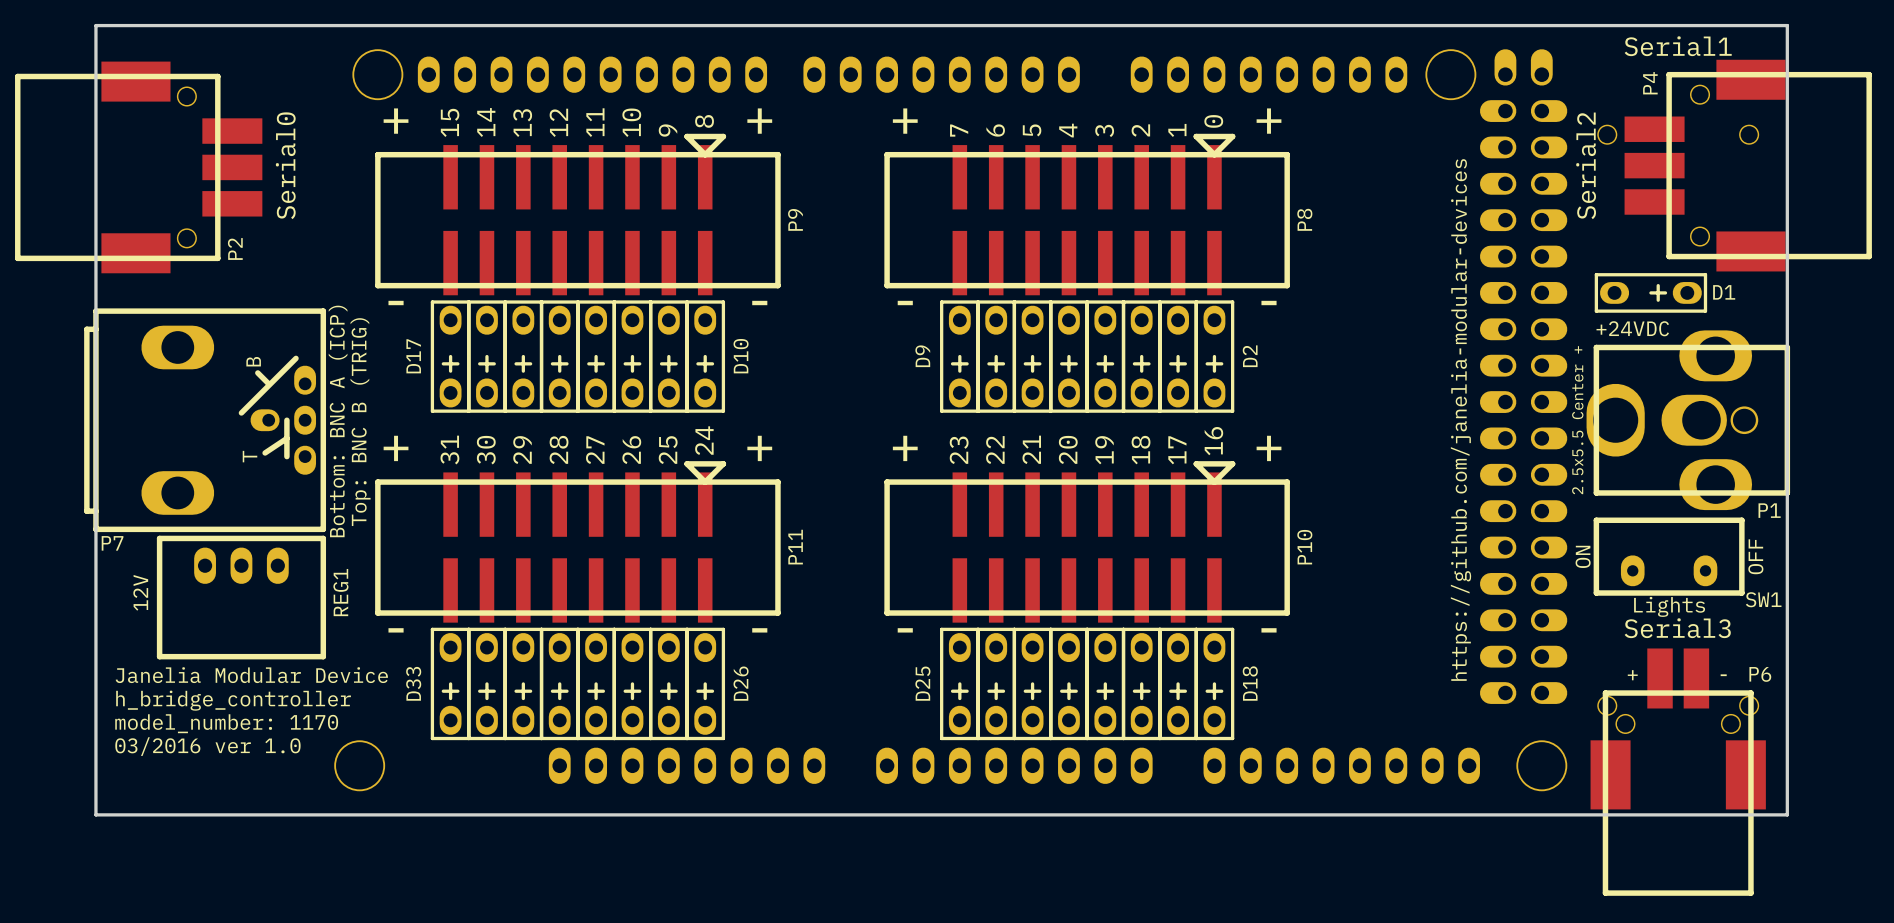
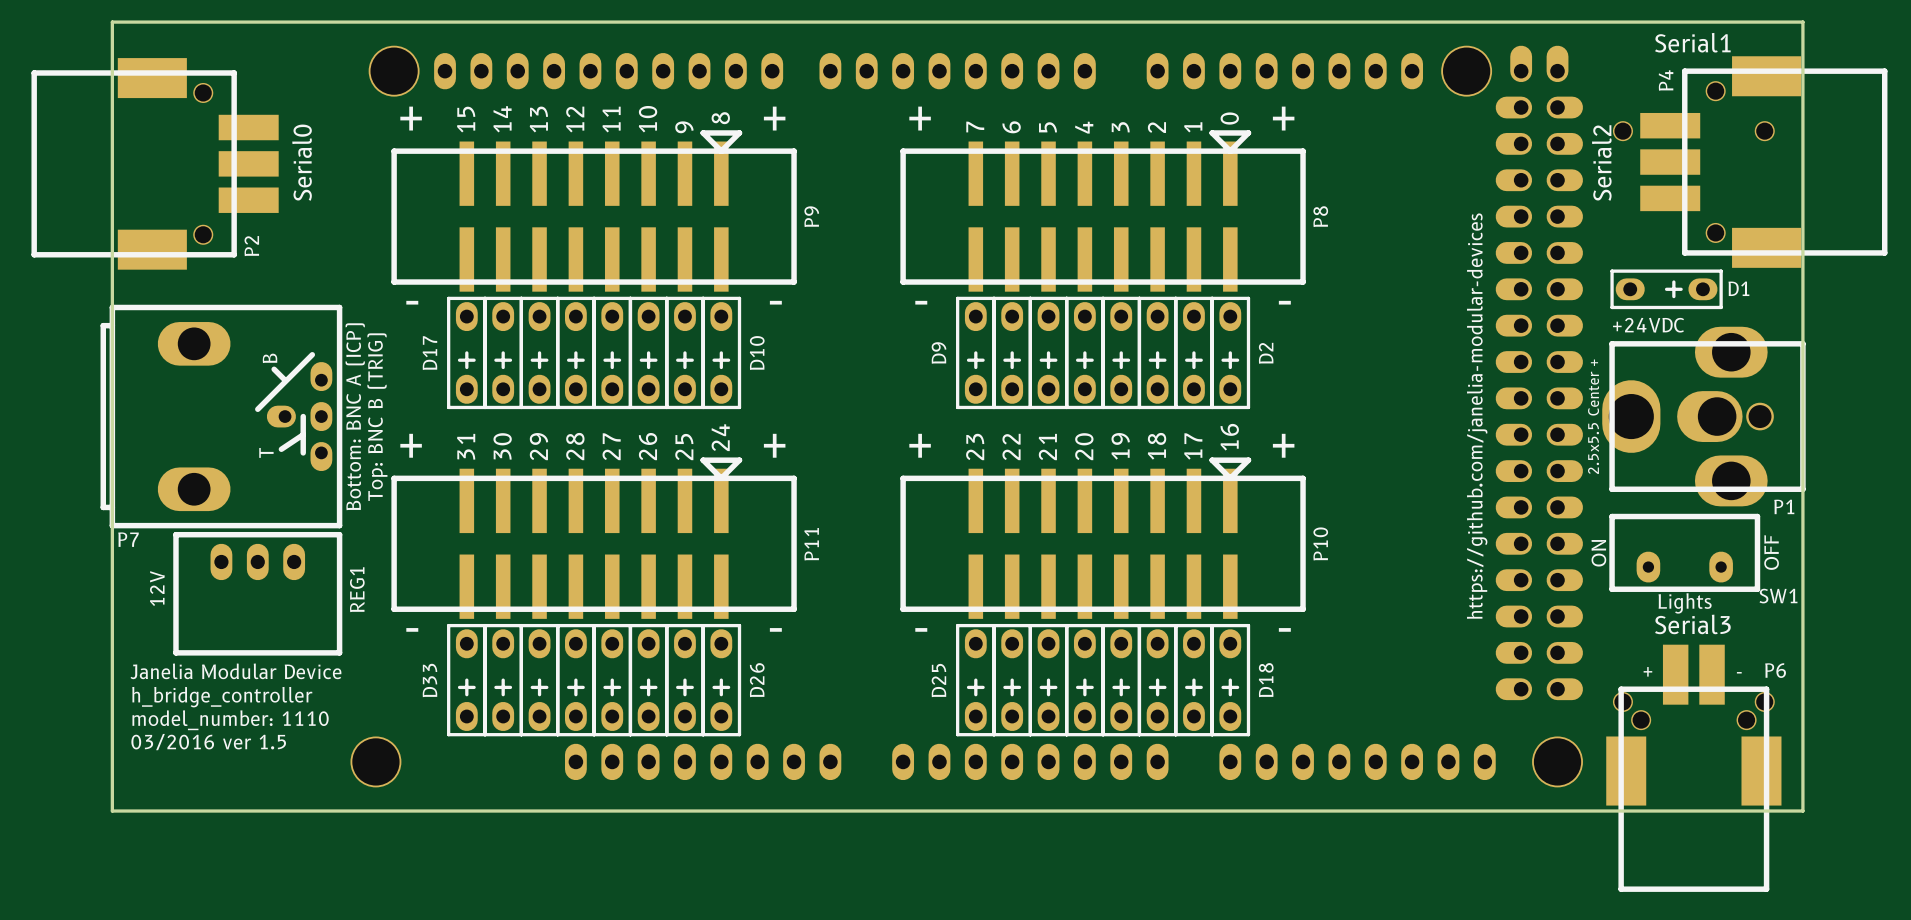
text: model_number: 1170 (226, 723) -> model_number: 1110 (230, 720)
text: 03/2016 ver 1.0 (207, 746) -> 03/2016 ver 1.5 (208, 742)

